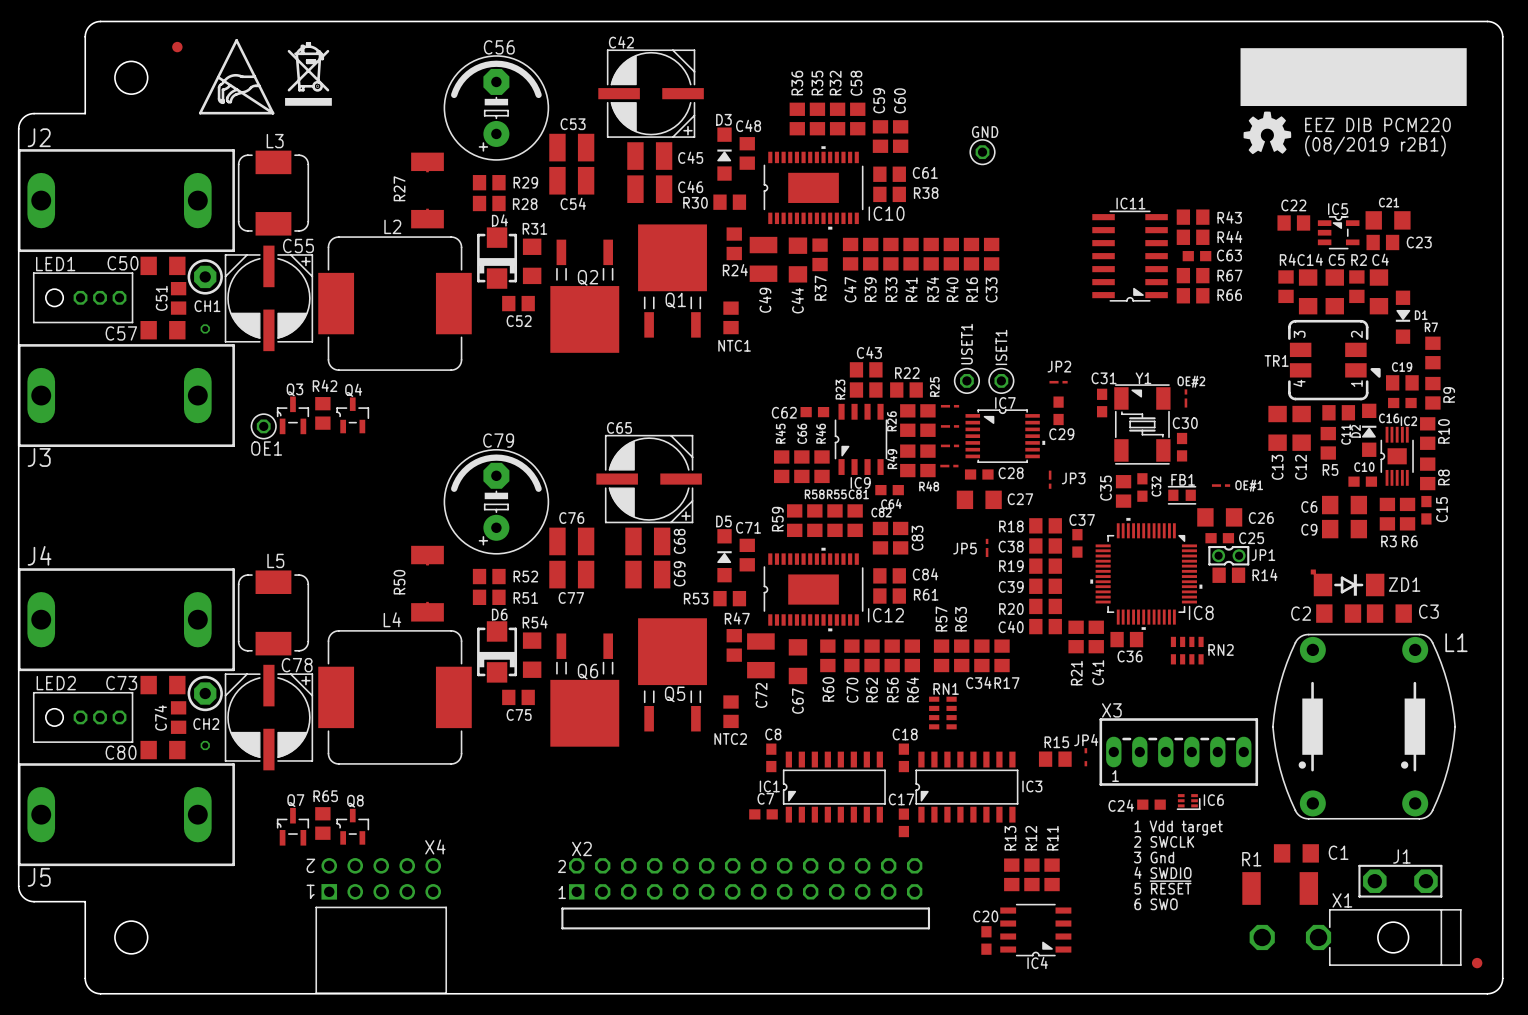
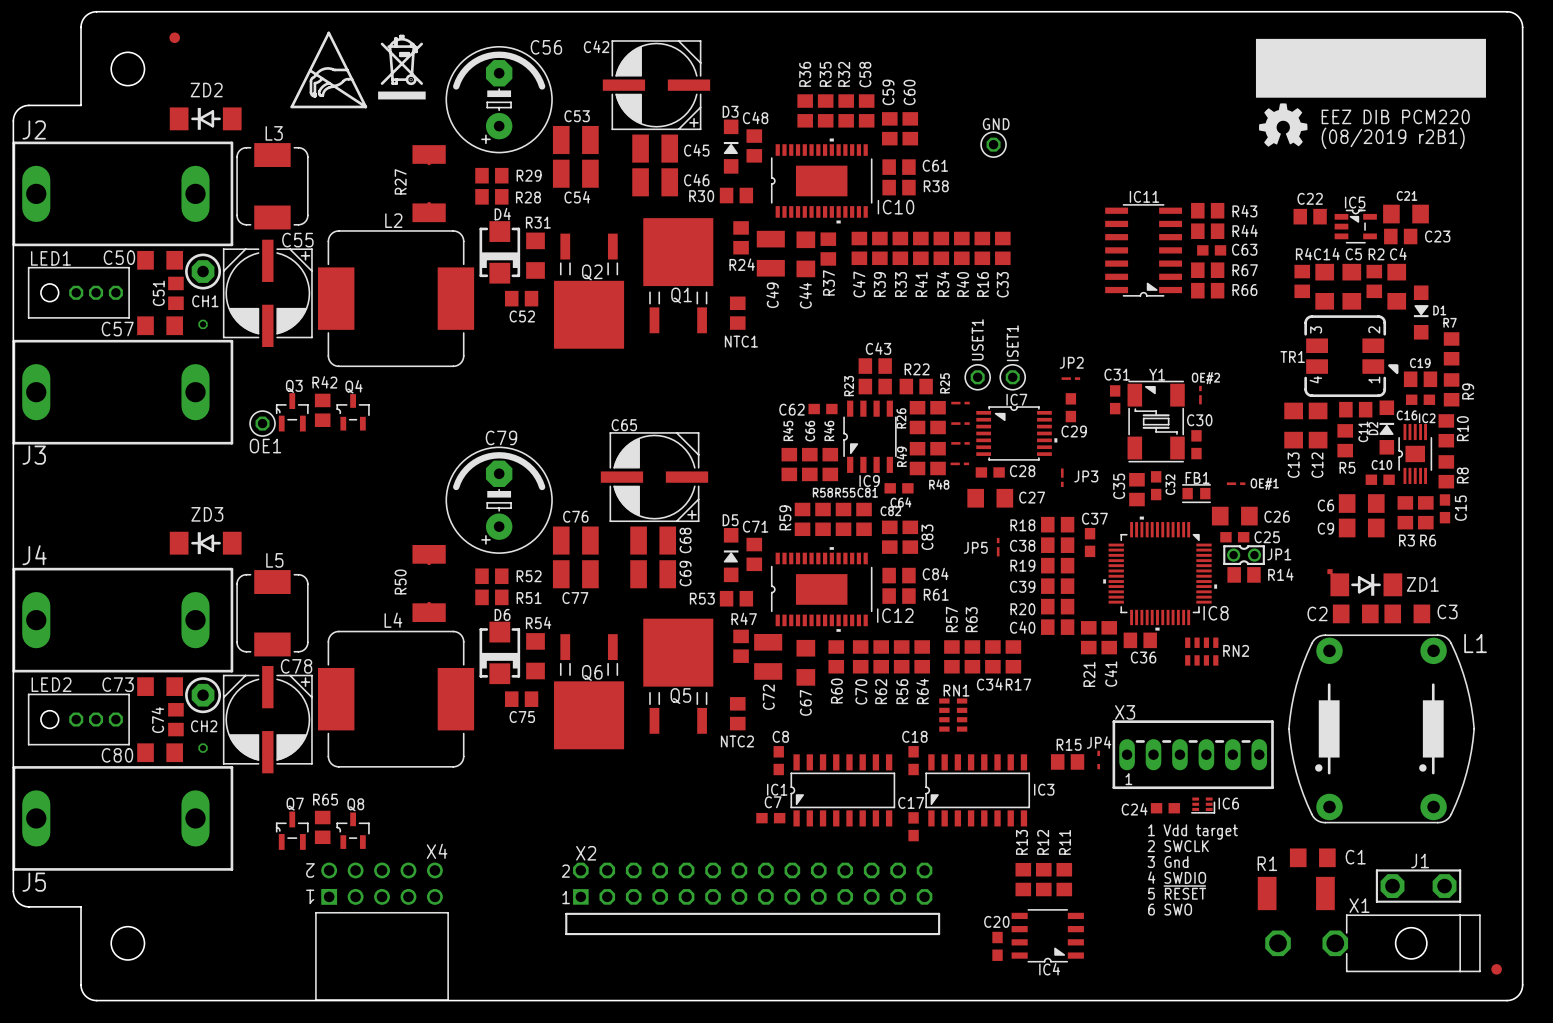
C42 name position: C42 (621, 42) -> C42 (596, 46)
C56 name position: C56 (499, 47) -> C56 (546, 47)
drawing position: (308, 73) -> (401, 67)
drawing position: (236, 76) -> (328, 69)
ZD2: none -> (205, 118)
ZD3: none -> (205, 543)

